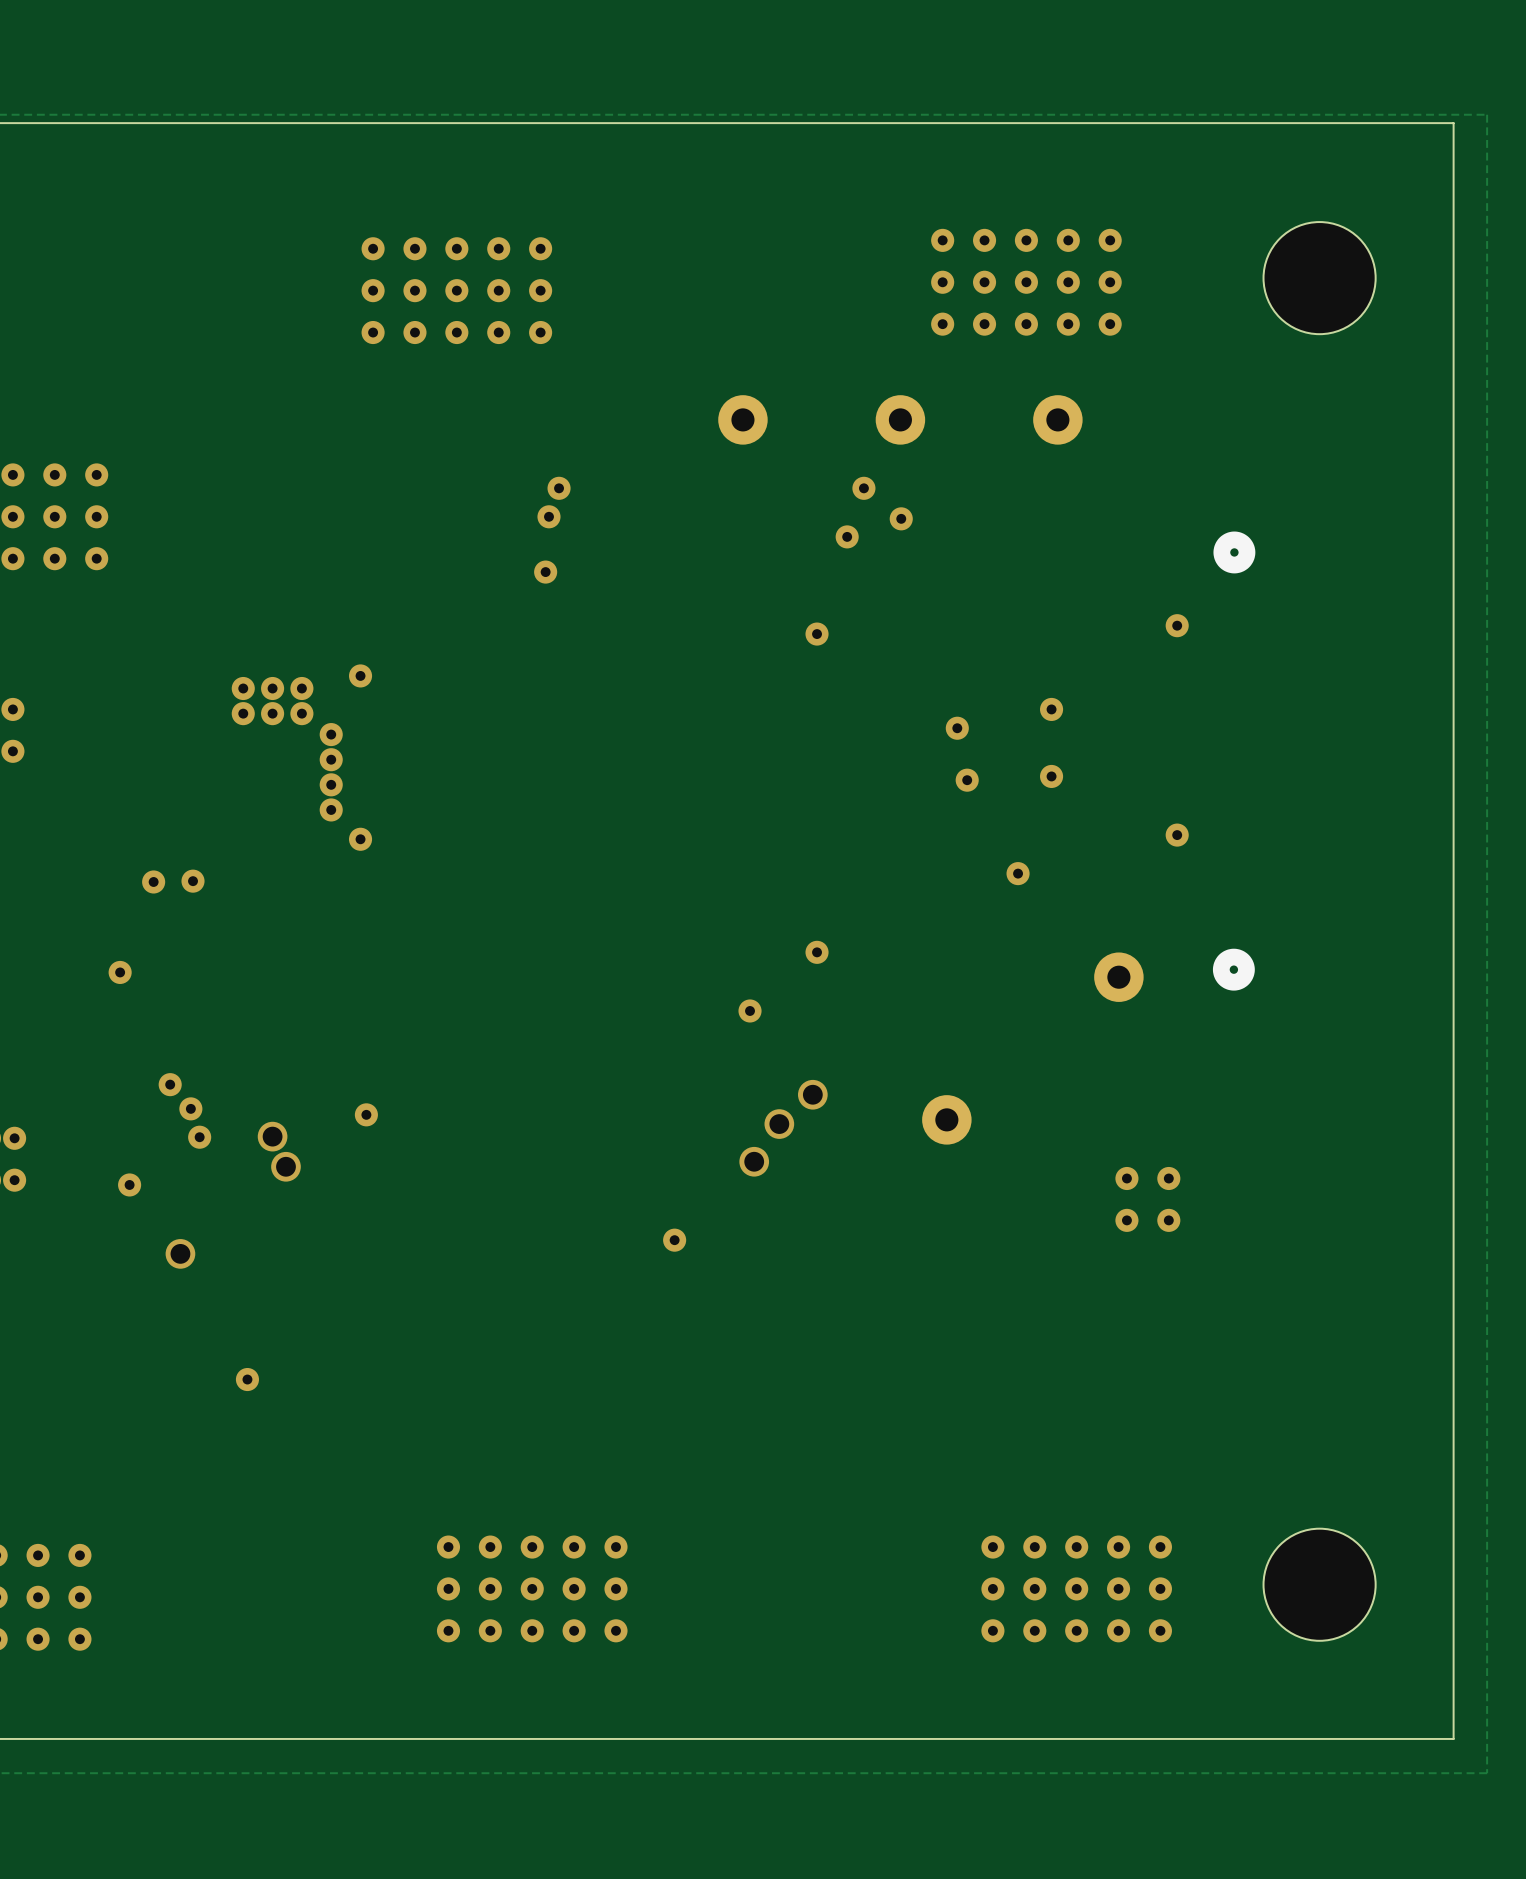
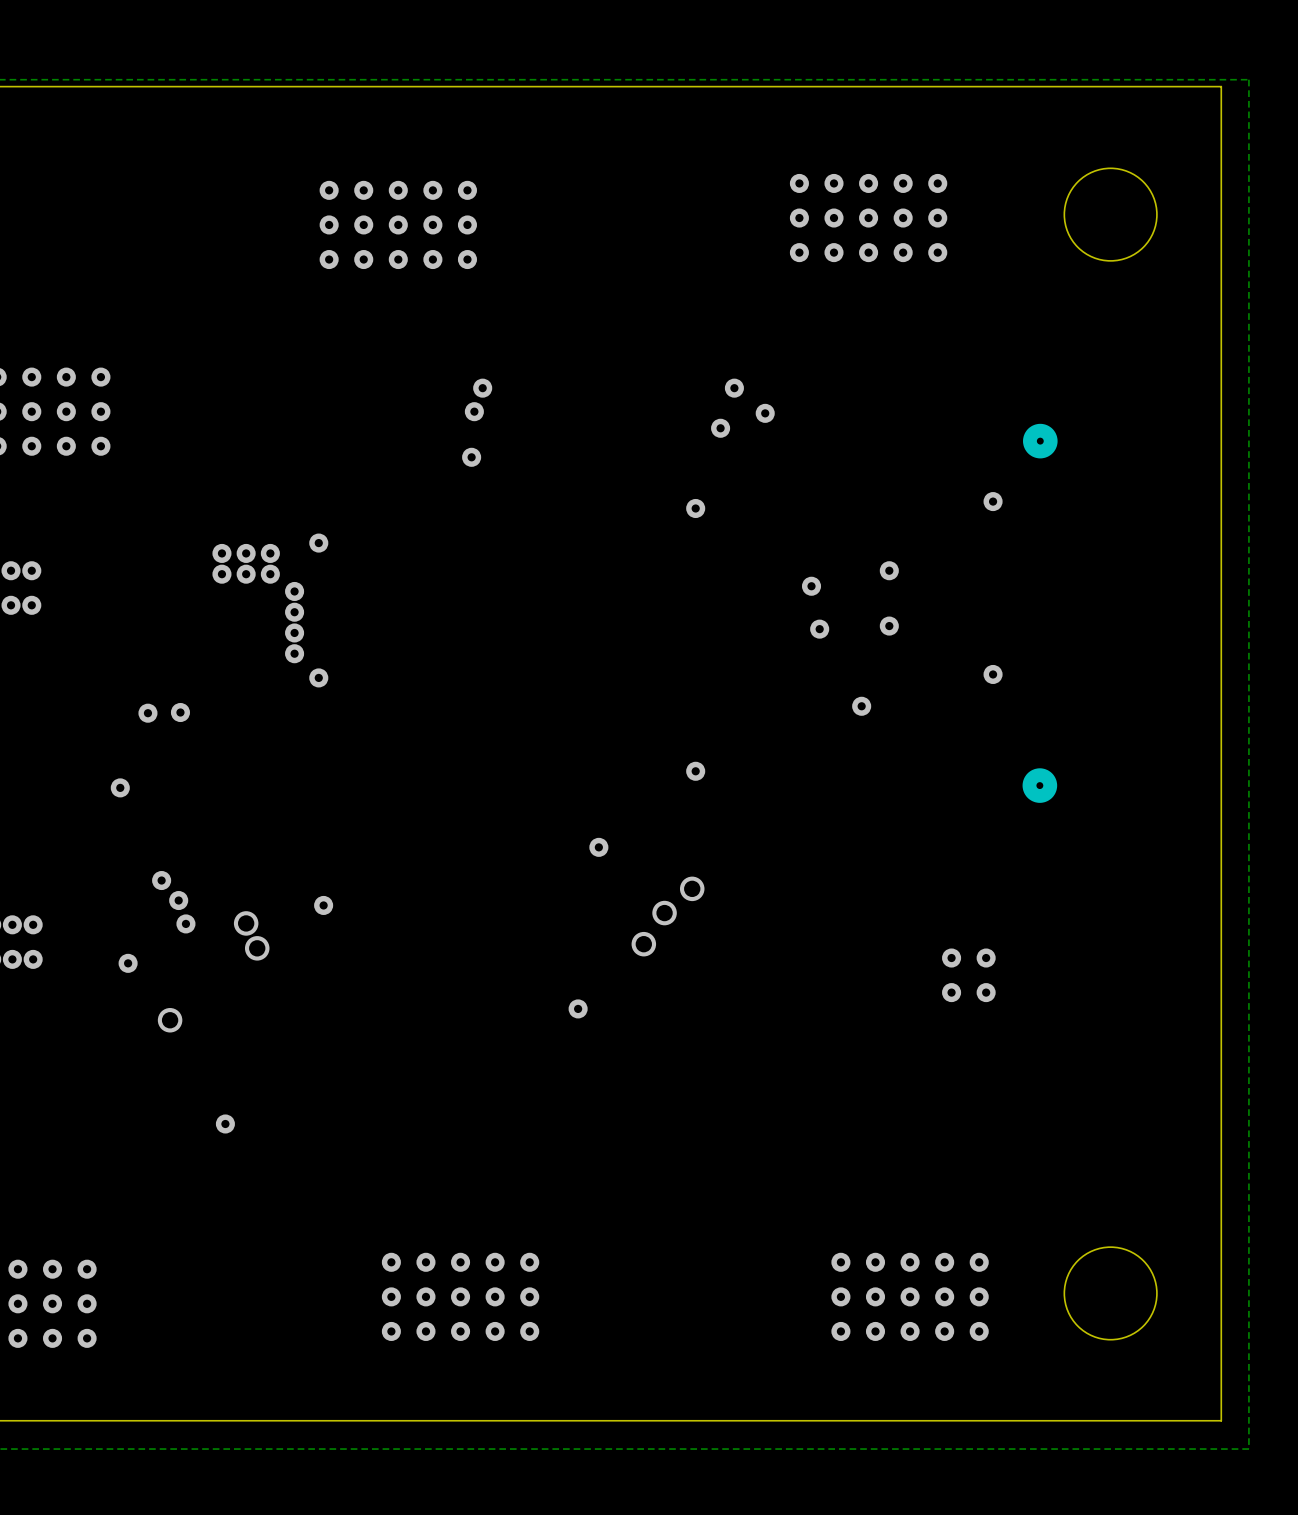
part: (742, 419) -> none
part: (900, 419) -> none
part: (1057, 419) -> none
part: (1118, 977) -> none
via position: (750, 1010) -> (598, 847)
part: (946, 1119) -> none

